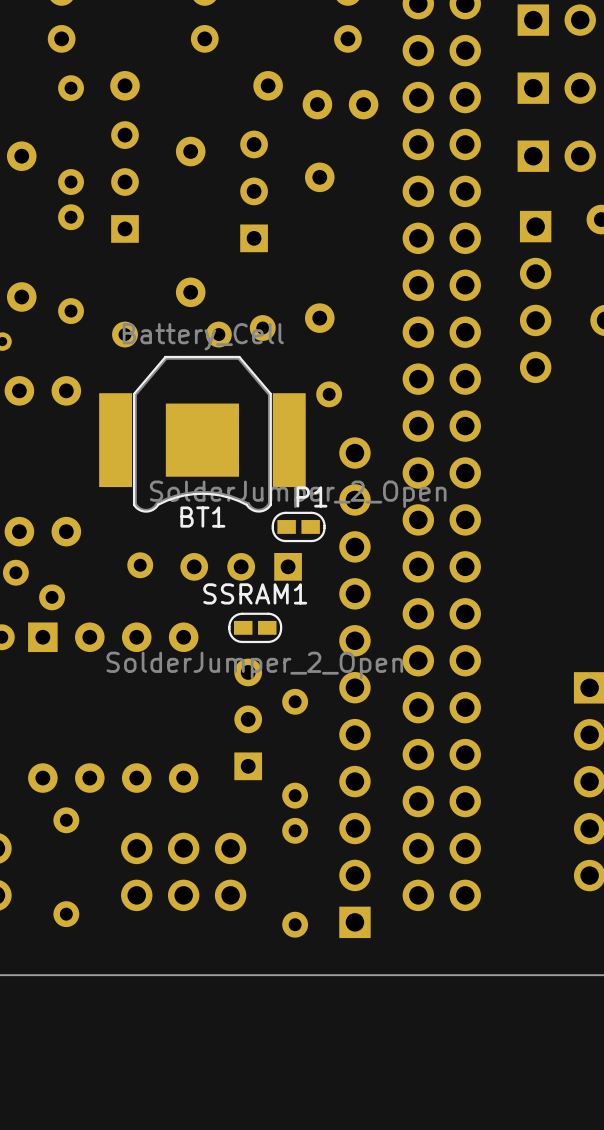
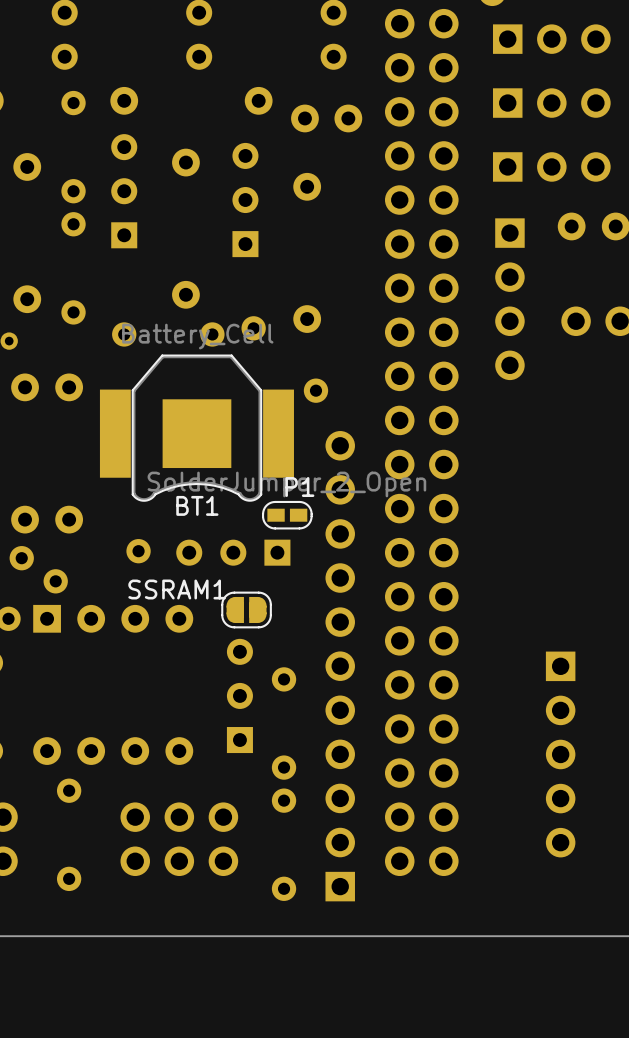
SSRAM1 name position: SSRAM1 (255, 593) -> SSRAM1 (177, 589)
SSRAM1 footprint: [228, 612, 283, 644] -> [221, 591, 272, 629]
SSRAM1 value: SolderJumper_2_Open (254, 665) -> none

